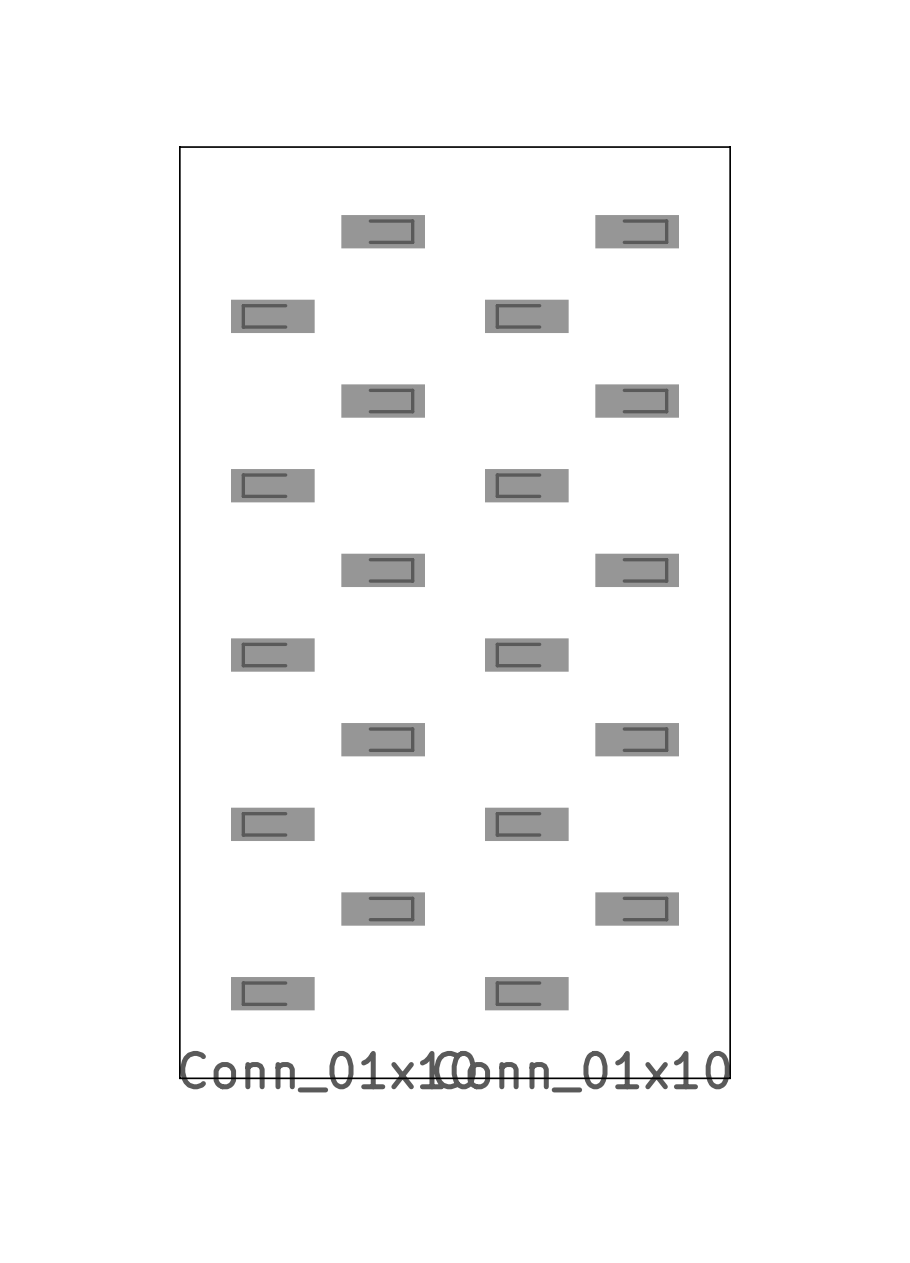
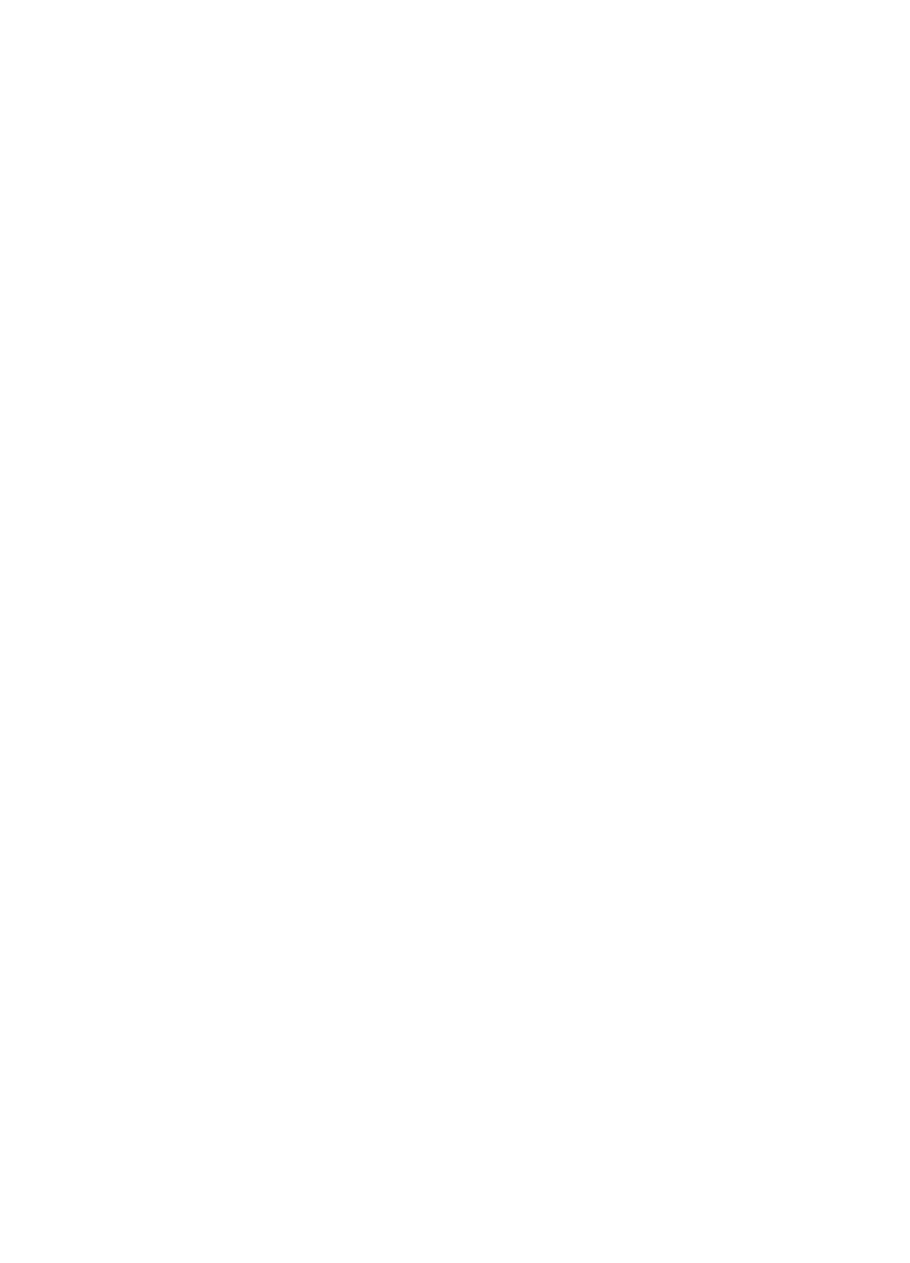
board edge: (730, 147) (730, 1078) (179, 1078) (179, 147) (730, 147) -> none
part: Conn_01x10 (328, 612) -> none
part: Conn_01x10 (581, 612) -> none

